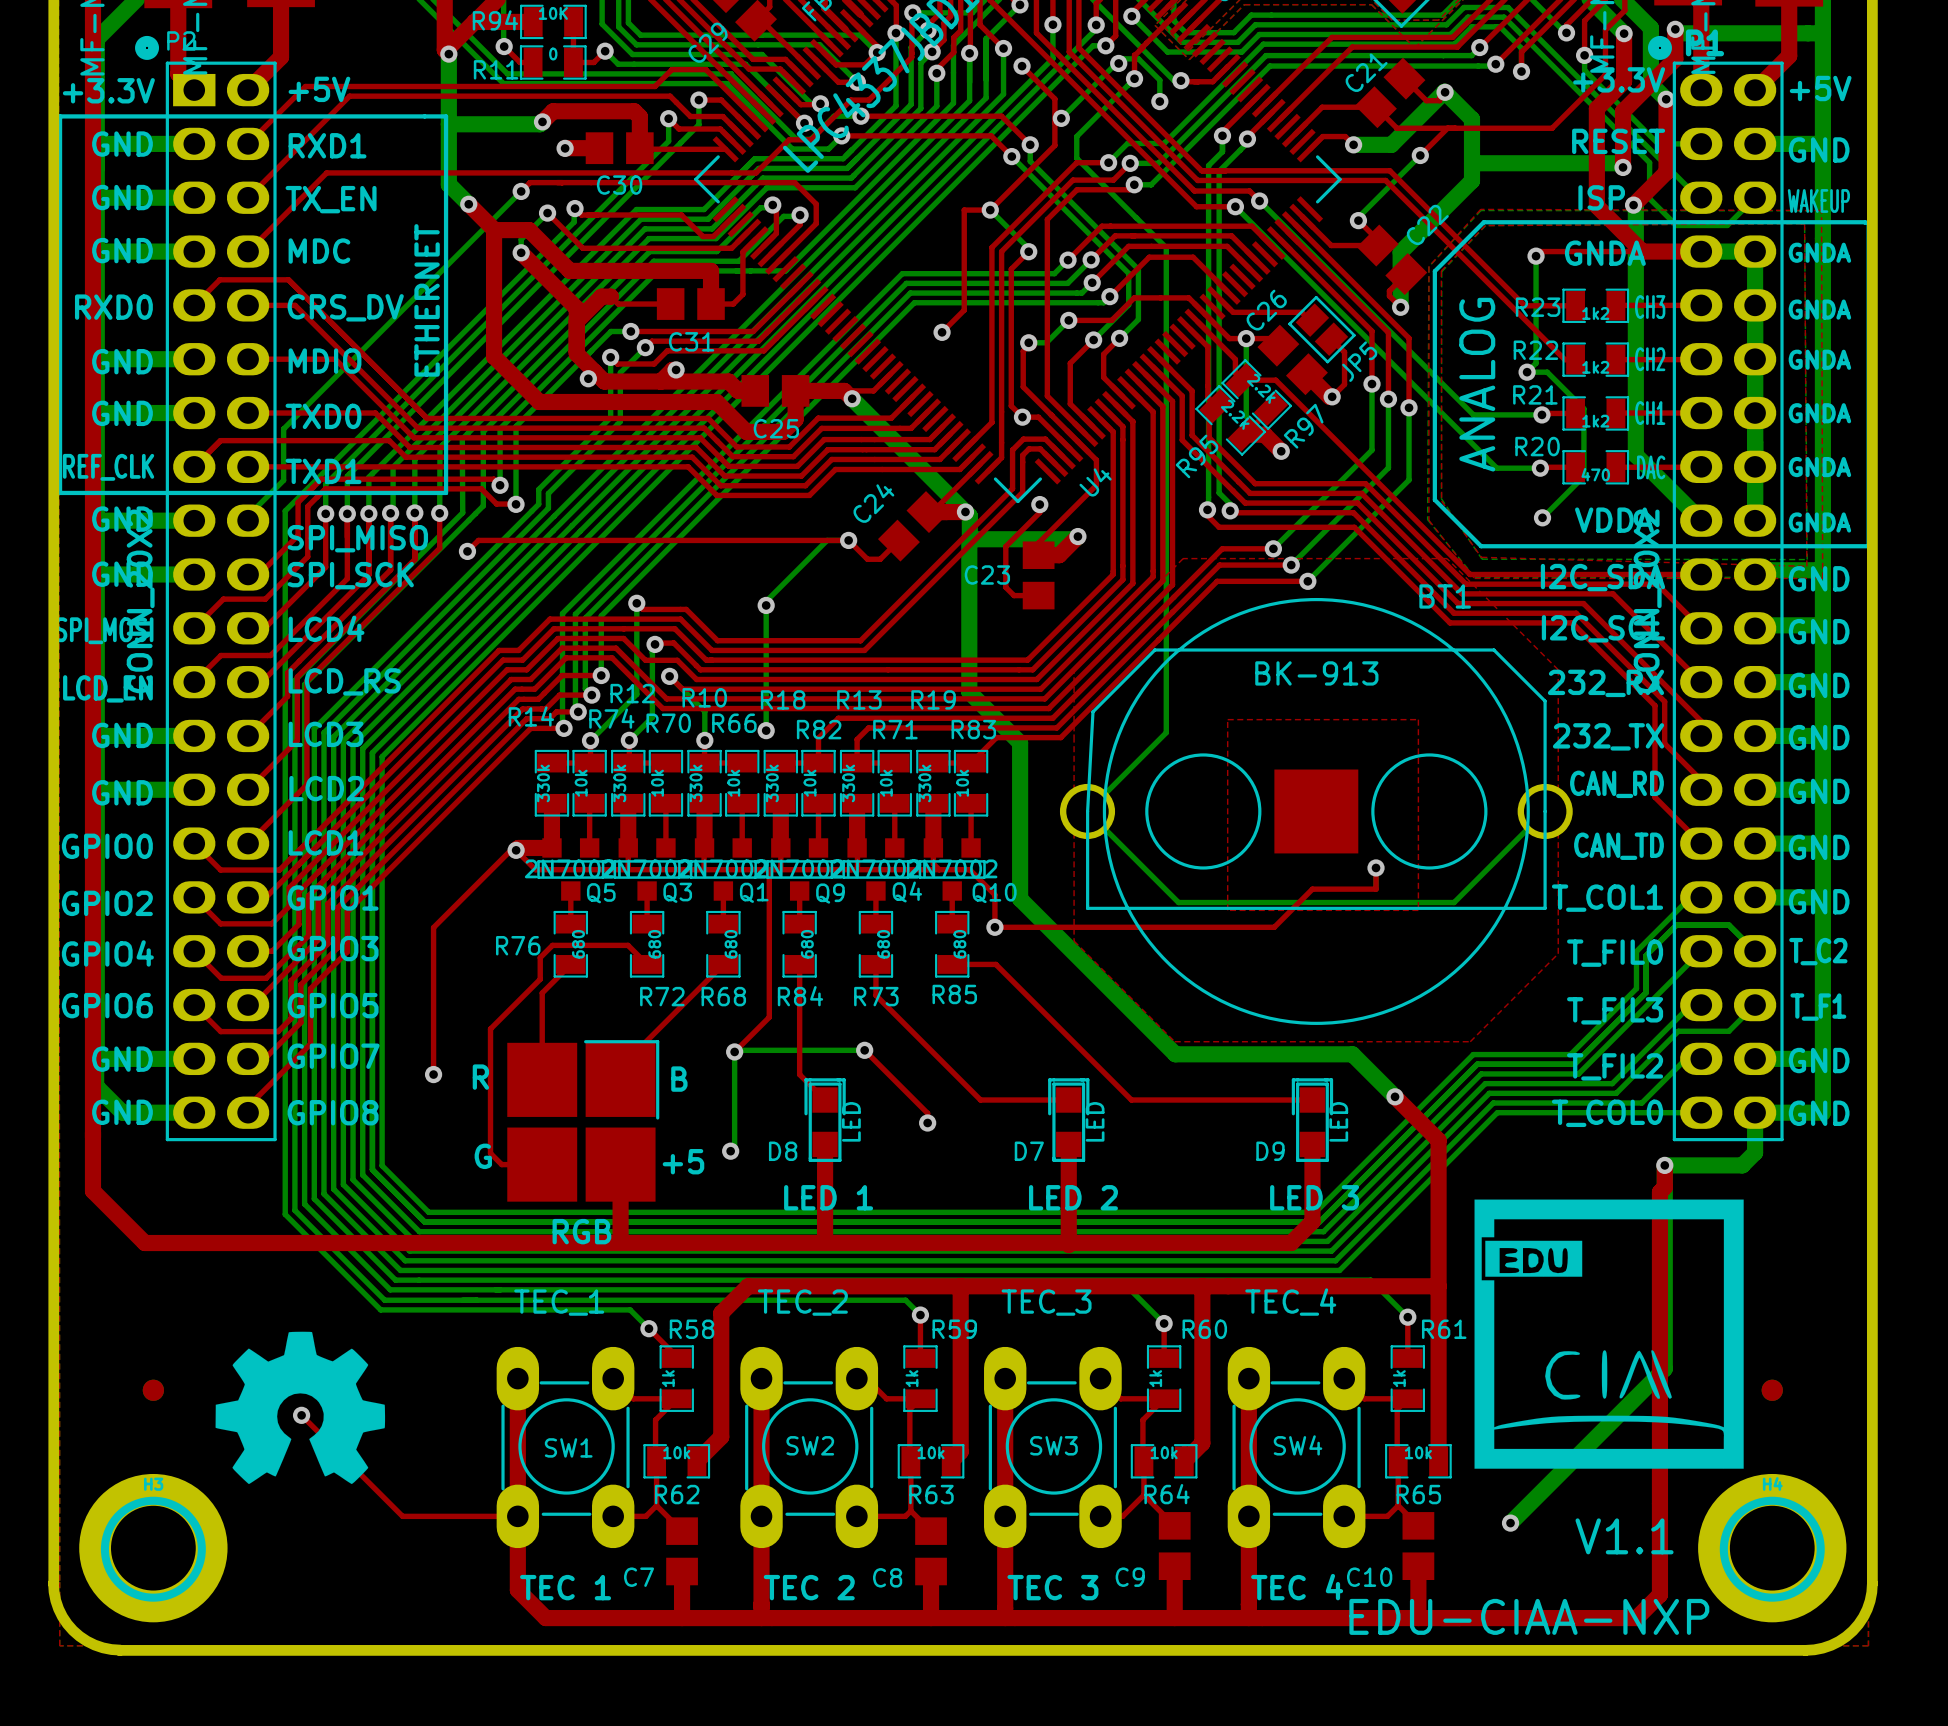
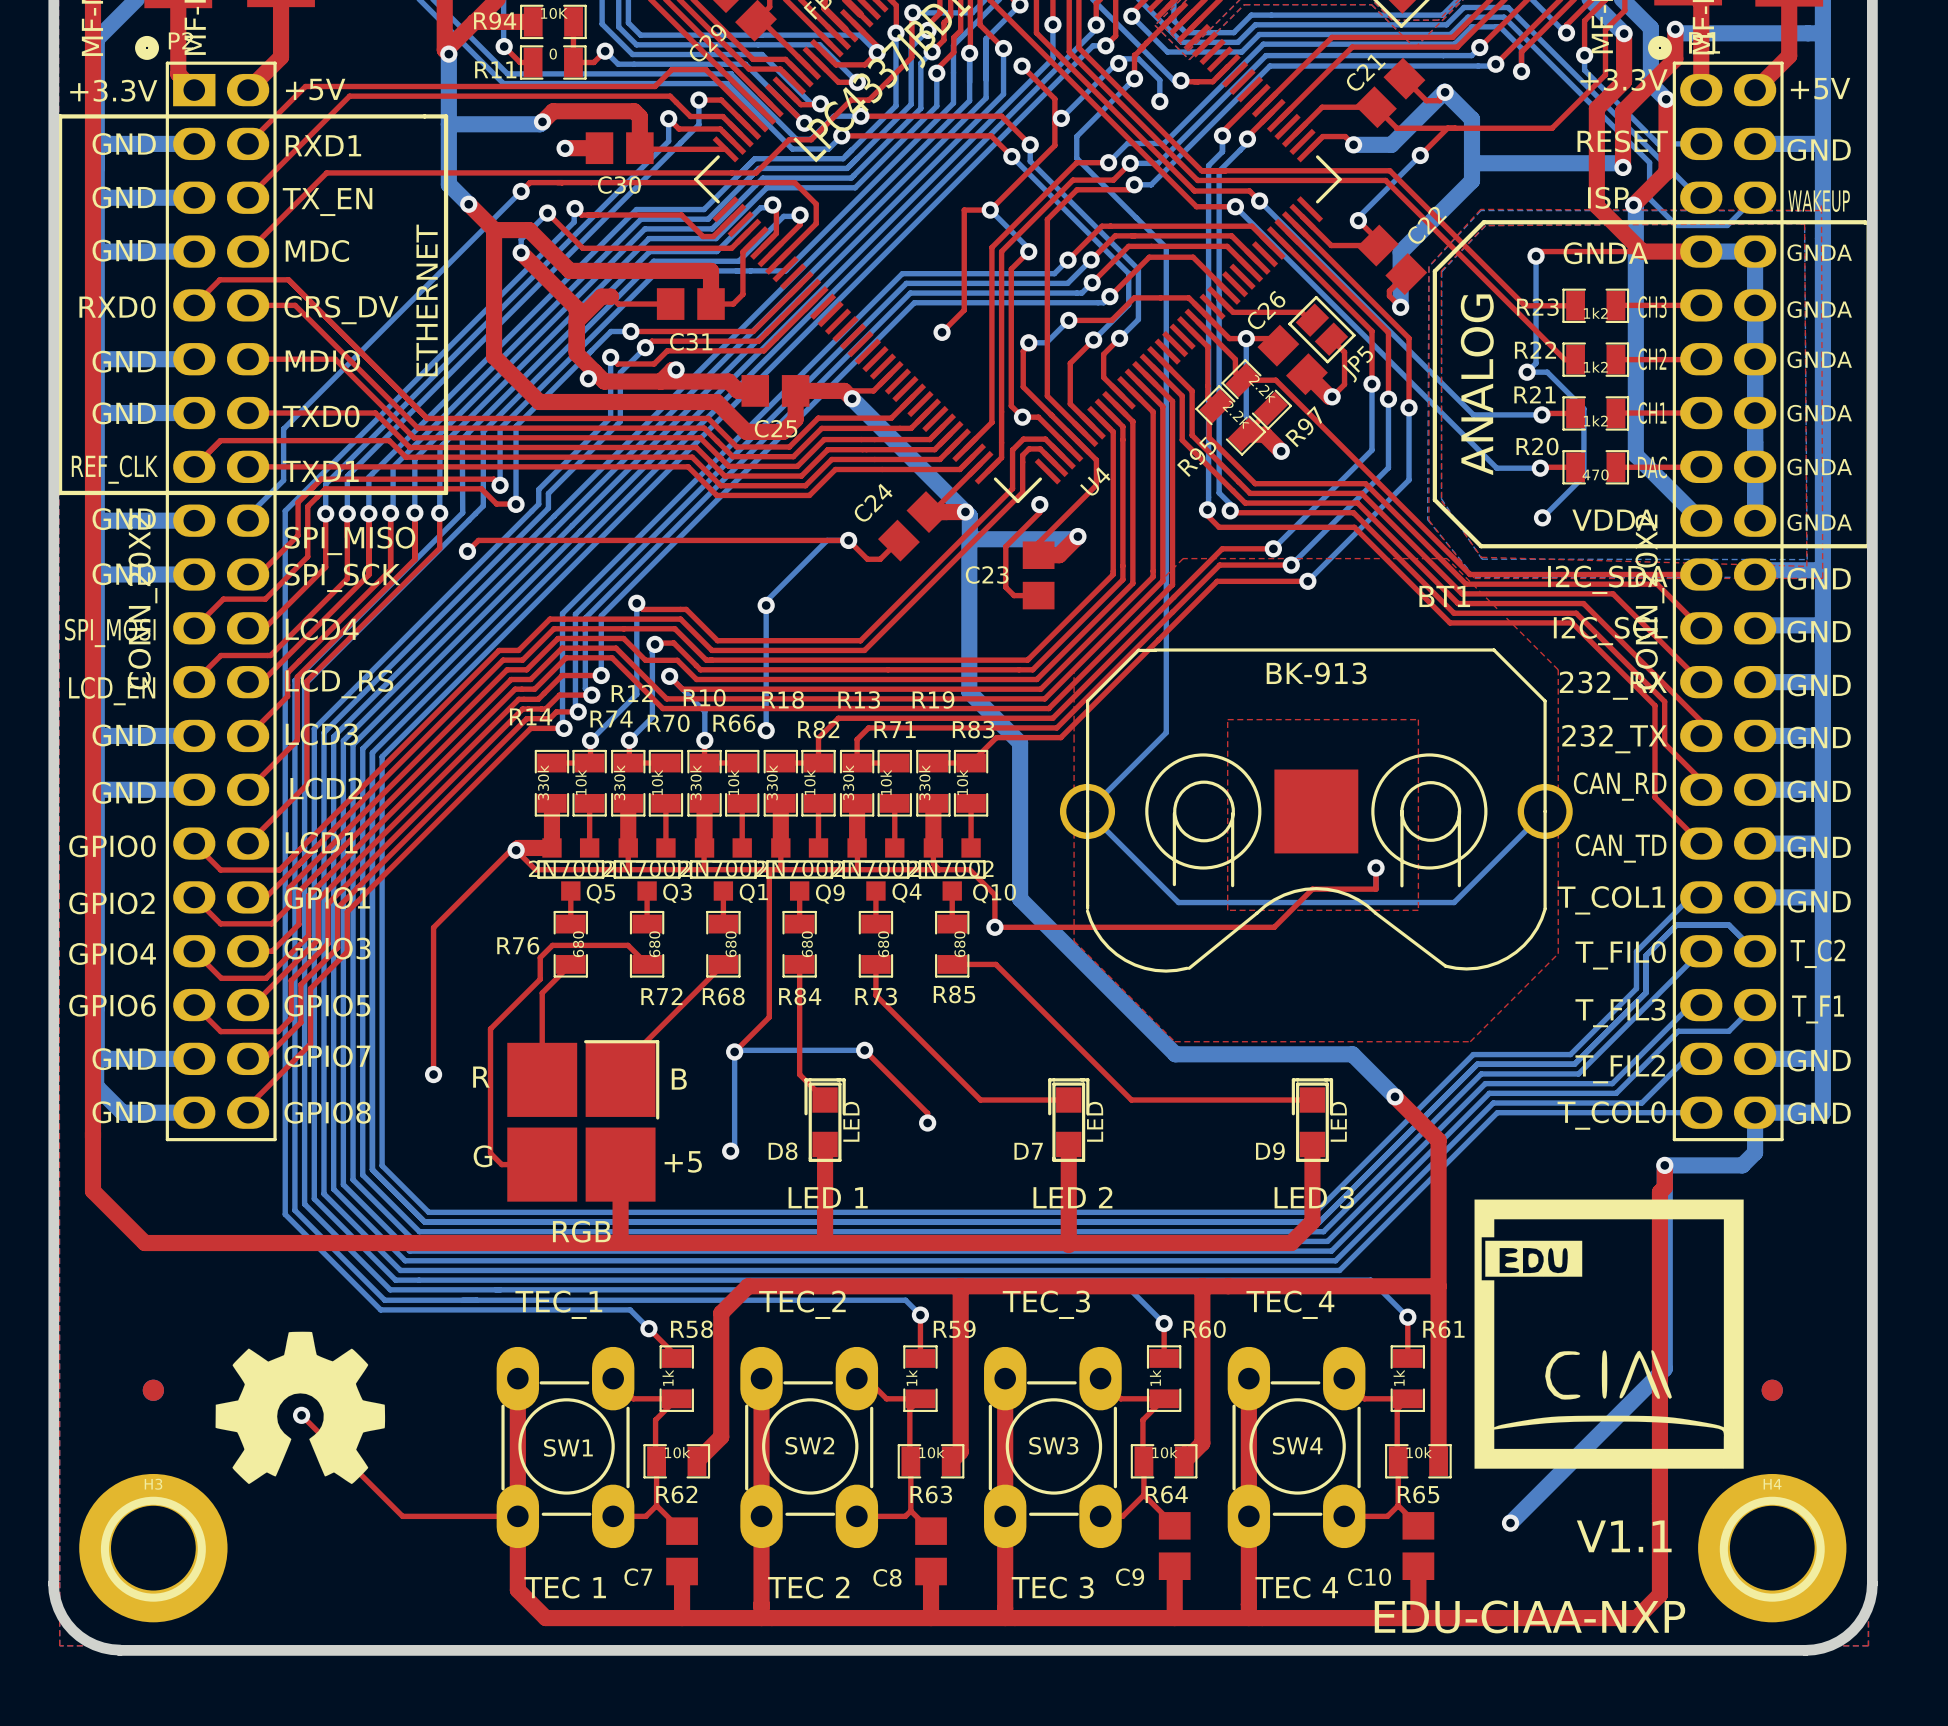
BT1 footprint: [1059, 597, 1573, 1025] -> [1059, 648, 1573, 973]

